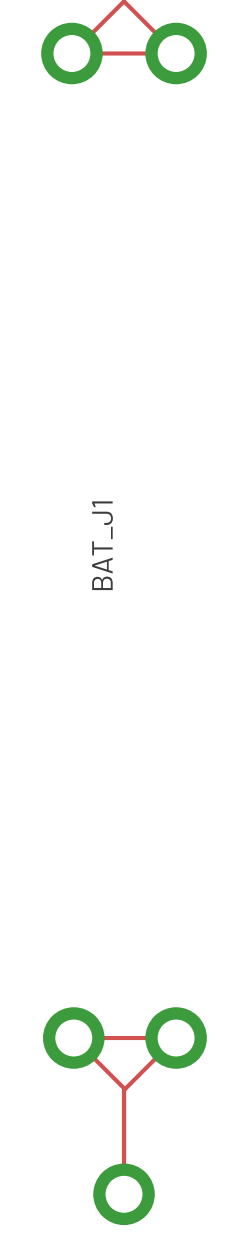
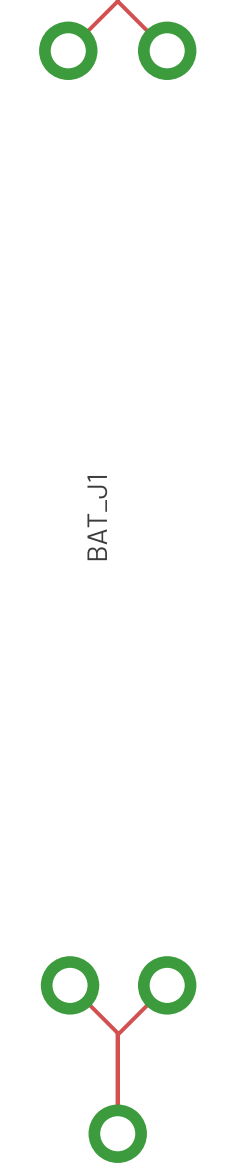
track: (71, 53) (176, 53) -> none
track: (73, 1038) (176, 1038) -> none

